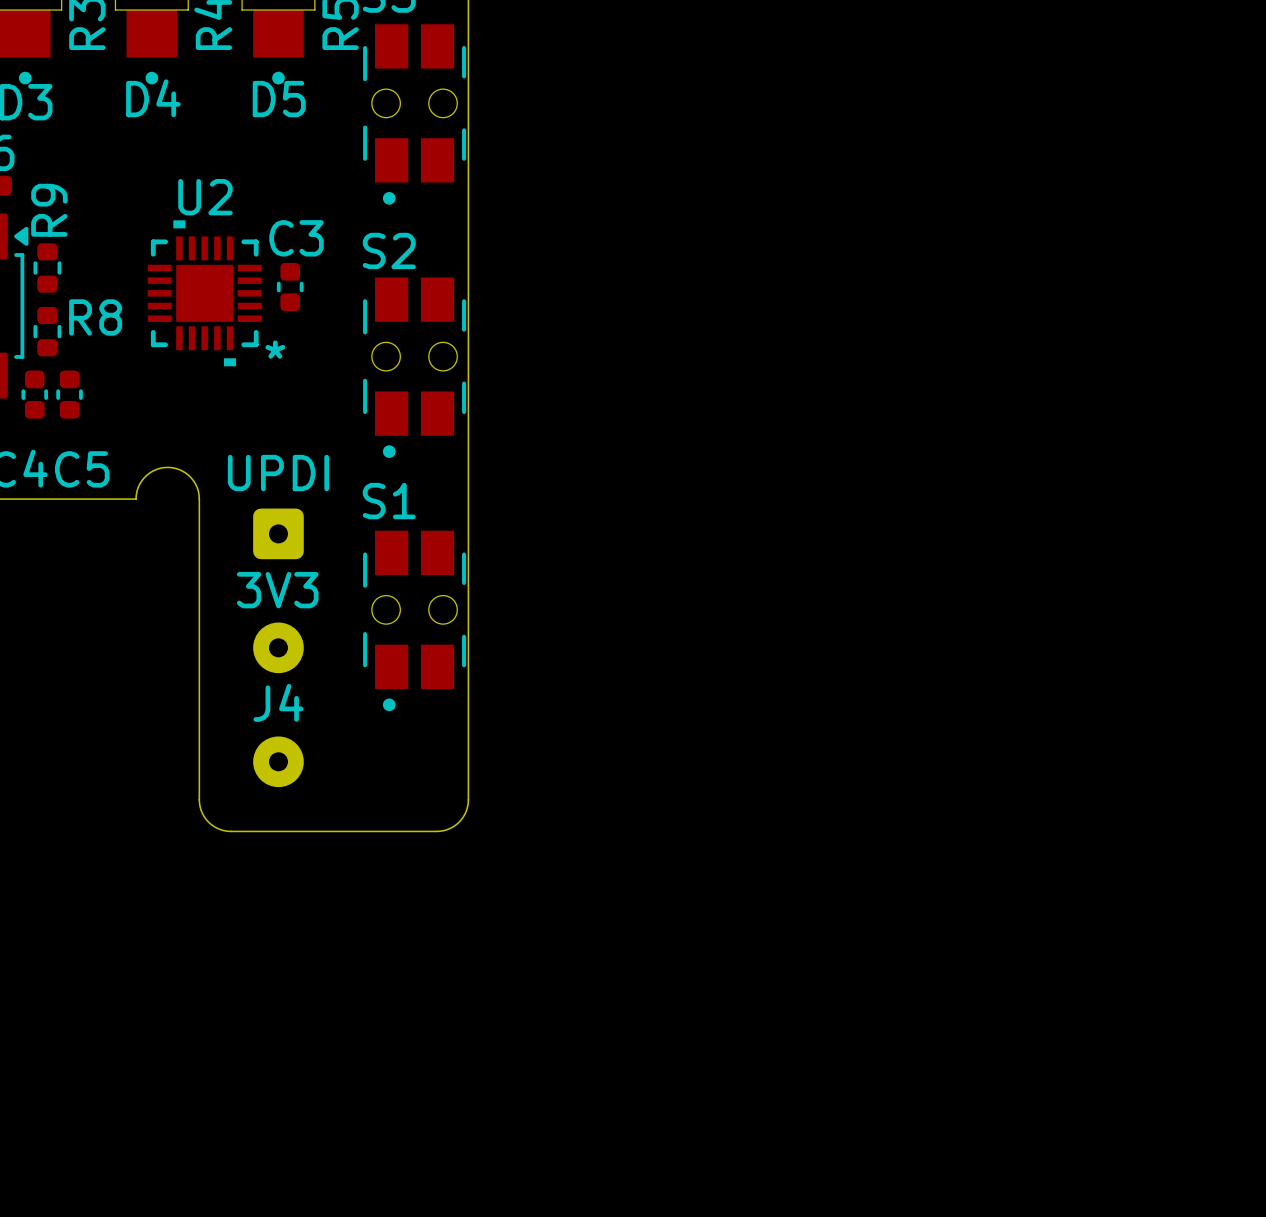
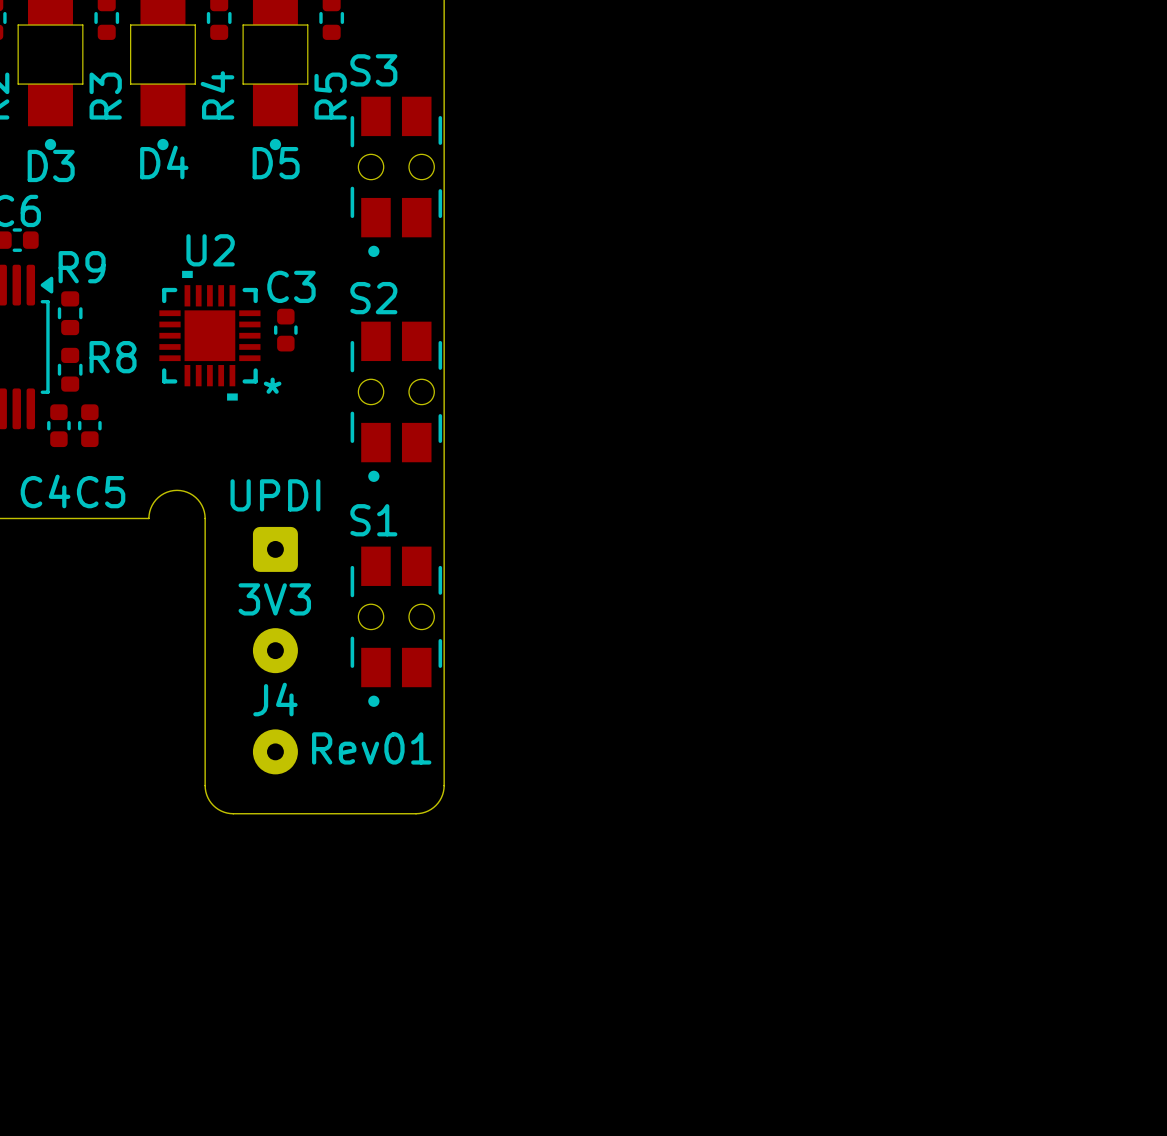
R9 name rotation: 0° (49, 210) -> 90° clockwise (82, 267)
text: none -> Rev01 (371, 748)

